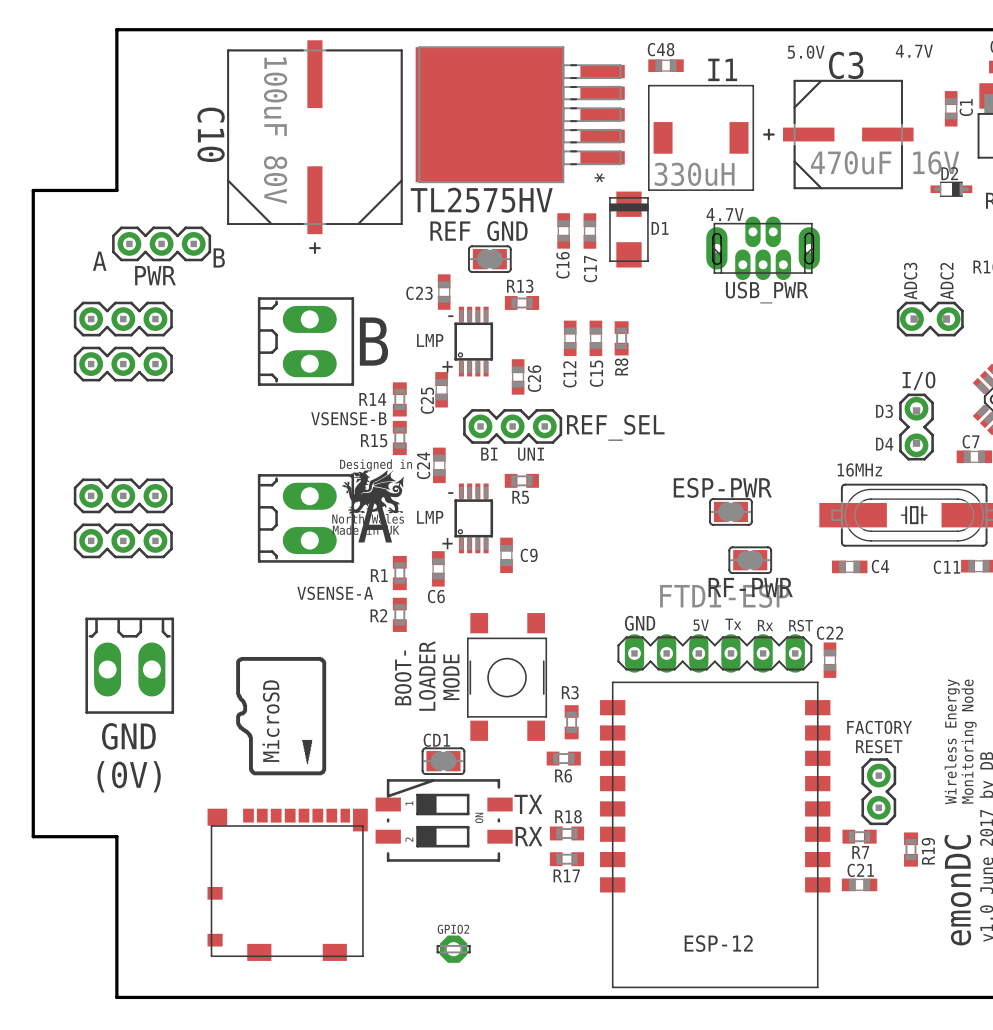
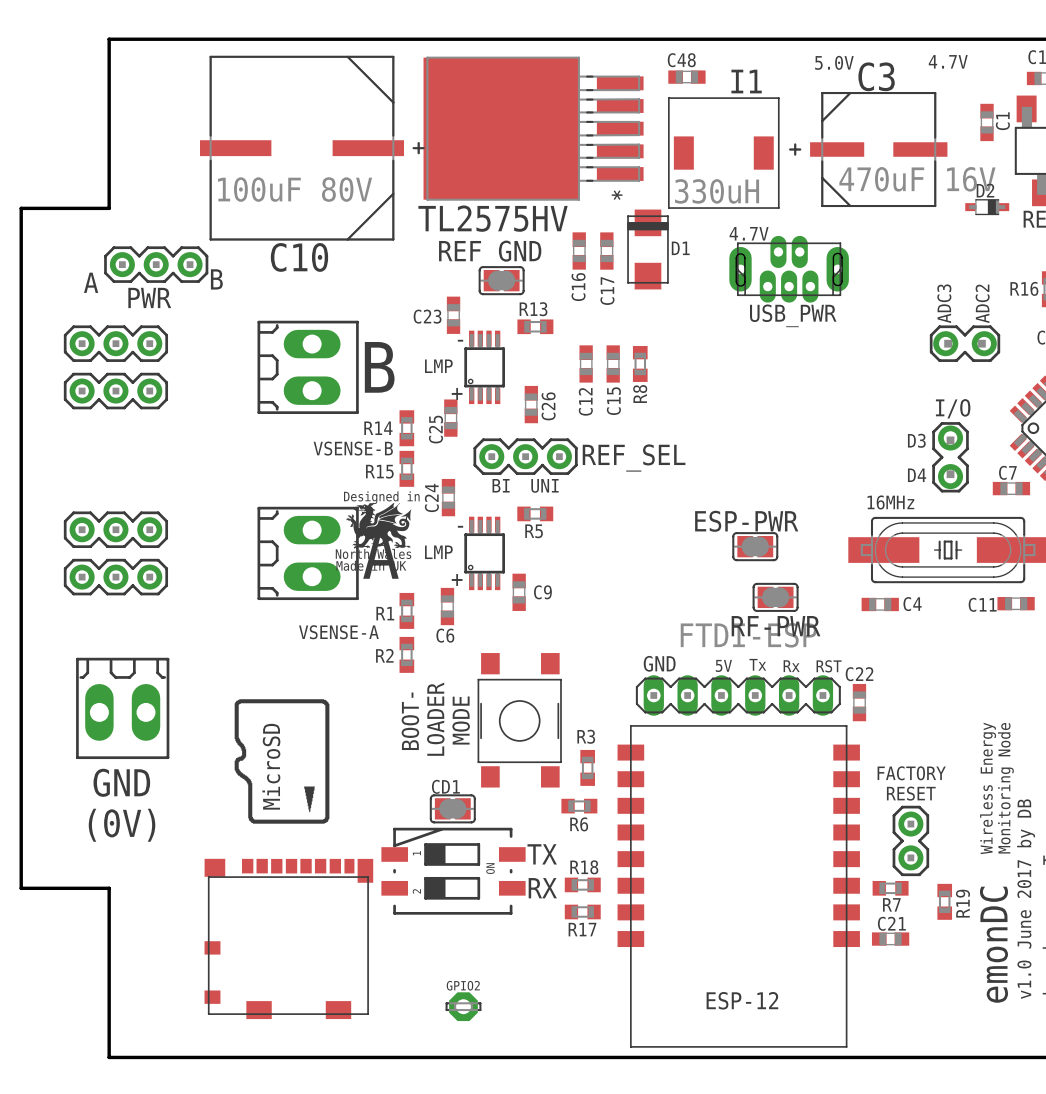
C10 rotation: 0° (314, 147) -> 90° counterclockwise (312, 148)

